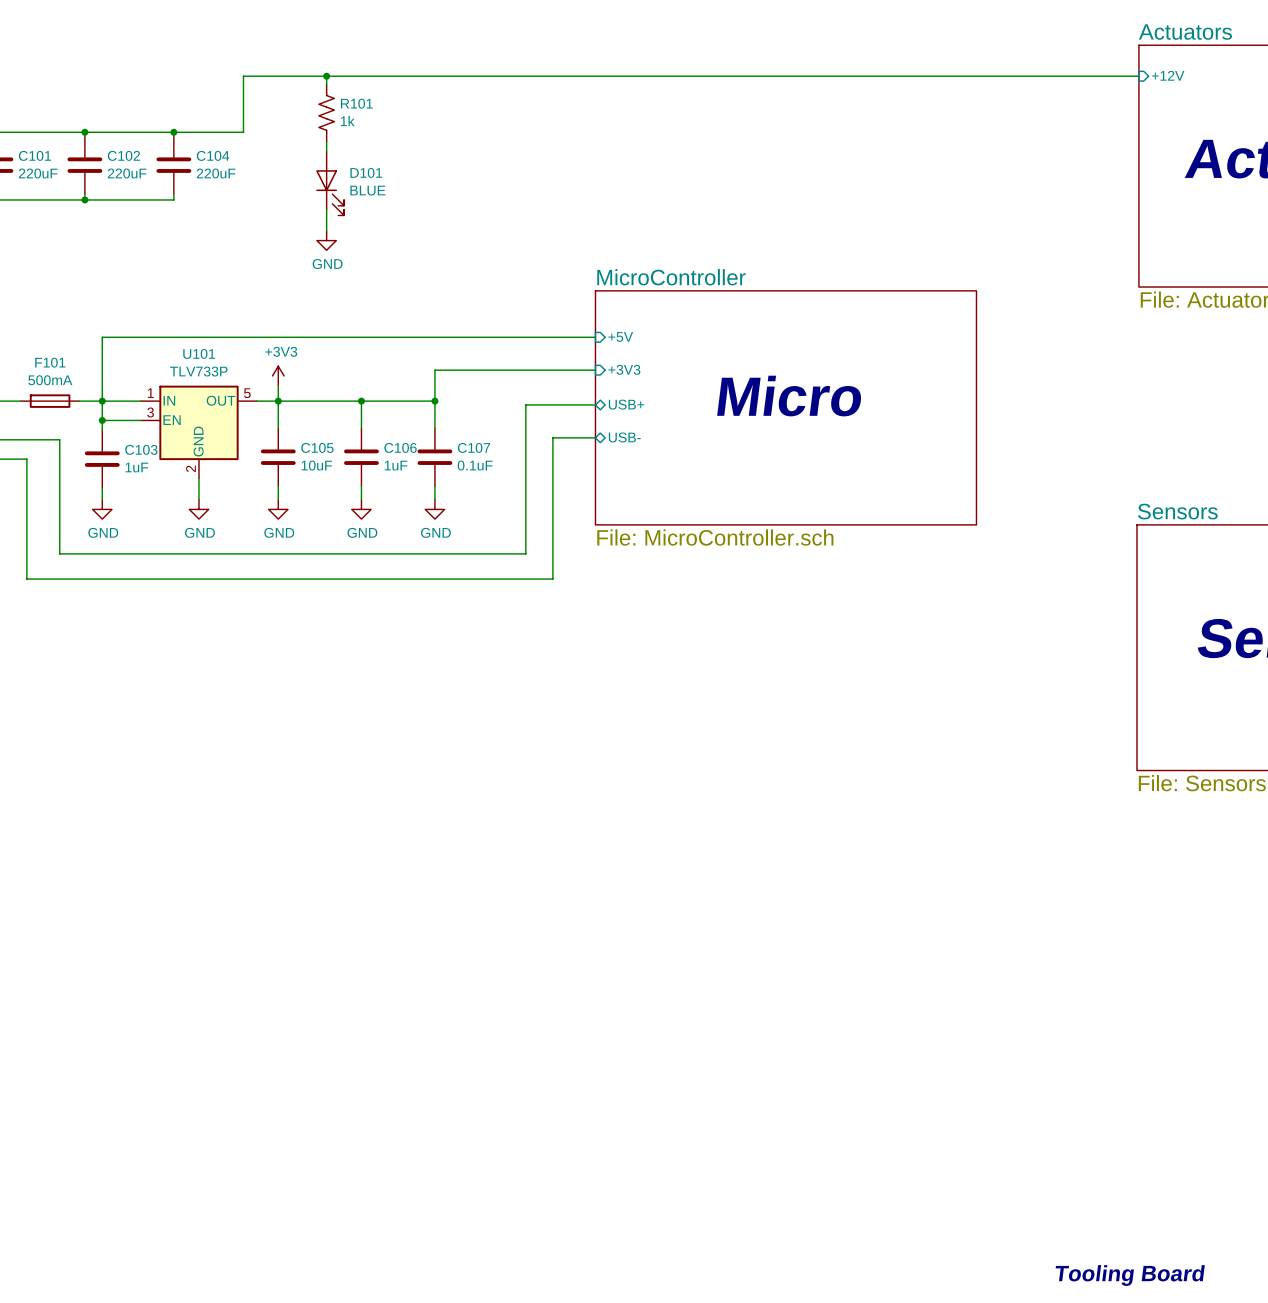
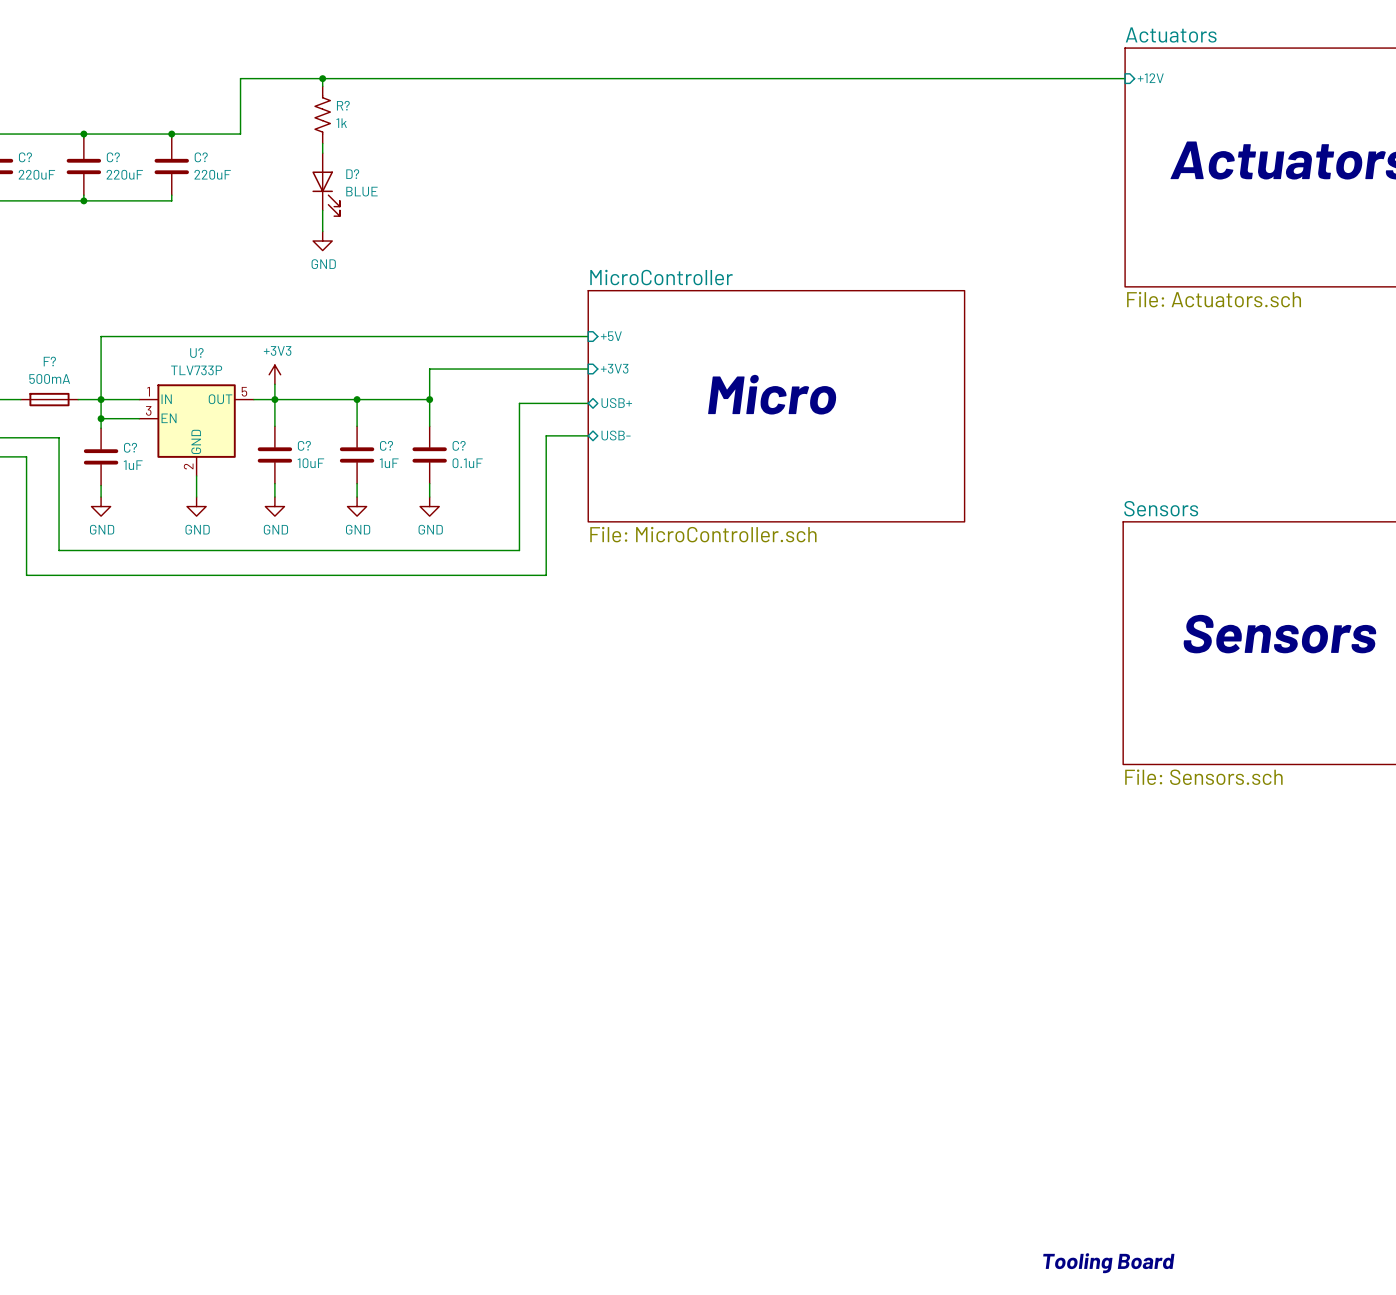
R101 name: R101 (356, 103) -> R? (343, 105)
C101 name: C101 (34, 155) -> C? (25, 157)
C102 name: C102 (123, 155) -> C? (113, 157)
C104 name: C104 (213, 155) -> C? (201, 157)
D101 name: D101 (366, 172) -> D? (352, 174)
U101 name: U101 (199, 353) -> U? (196, 352)
F101 name: F101 (50, 362) -> F? (49, 361)
C105 name: C105 (317, 447) -> C? (304, 445)
C106 name: C106 (400, 447) -> C? (386, 445)
C107 name: C107 (473, 447) -> C? (459, 445)
C103 name: C103 (141, 449) -> C? (130, 447)

